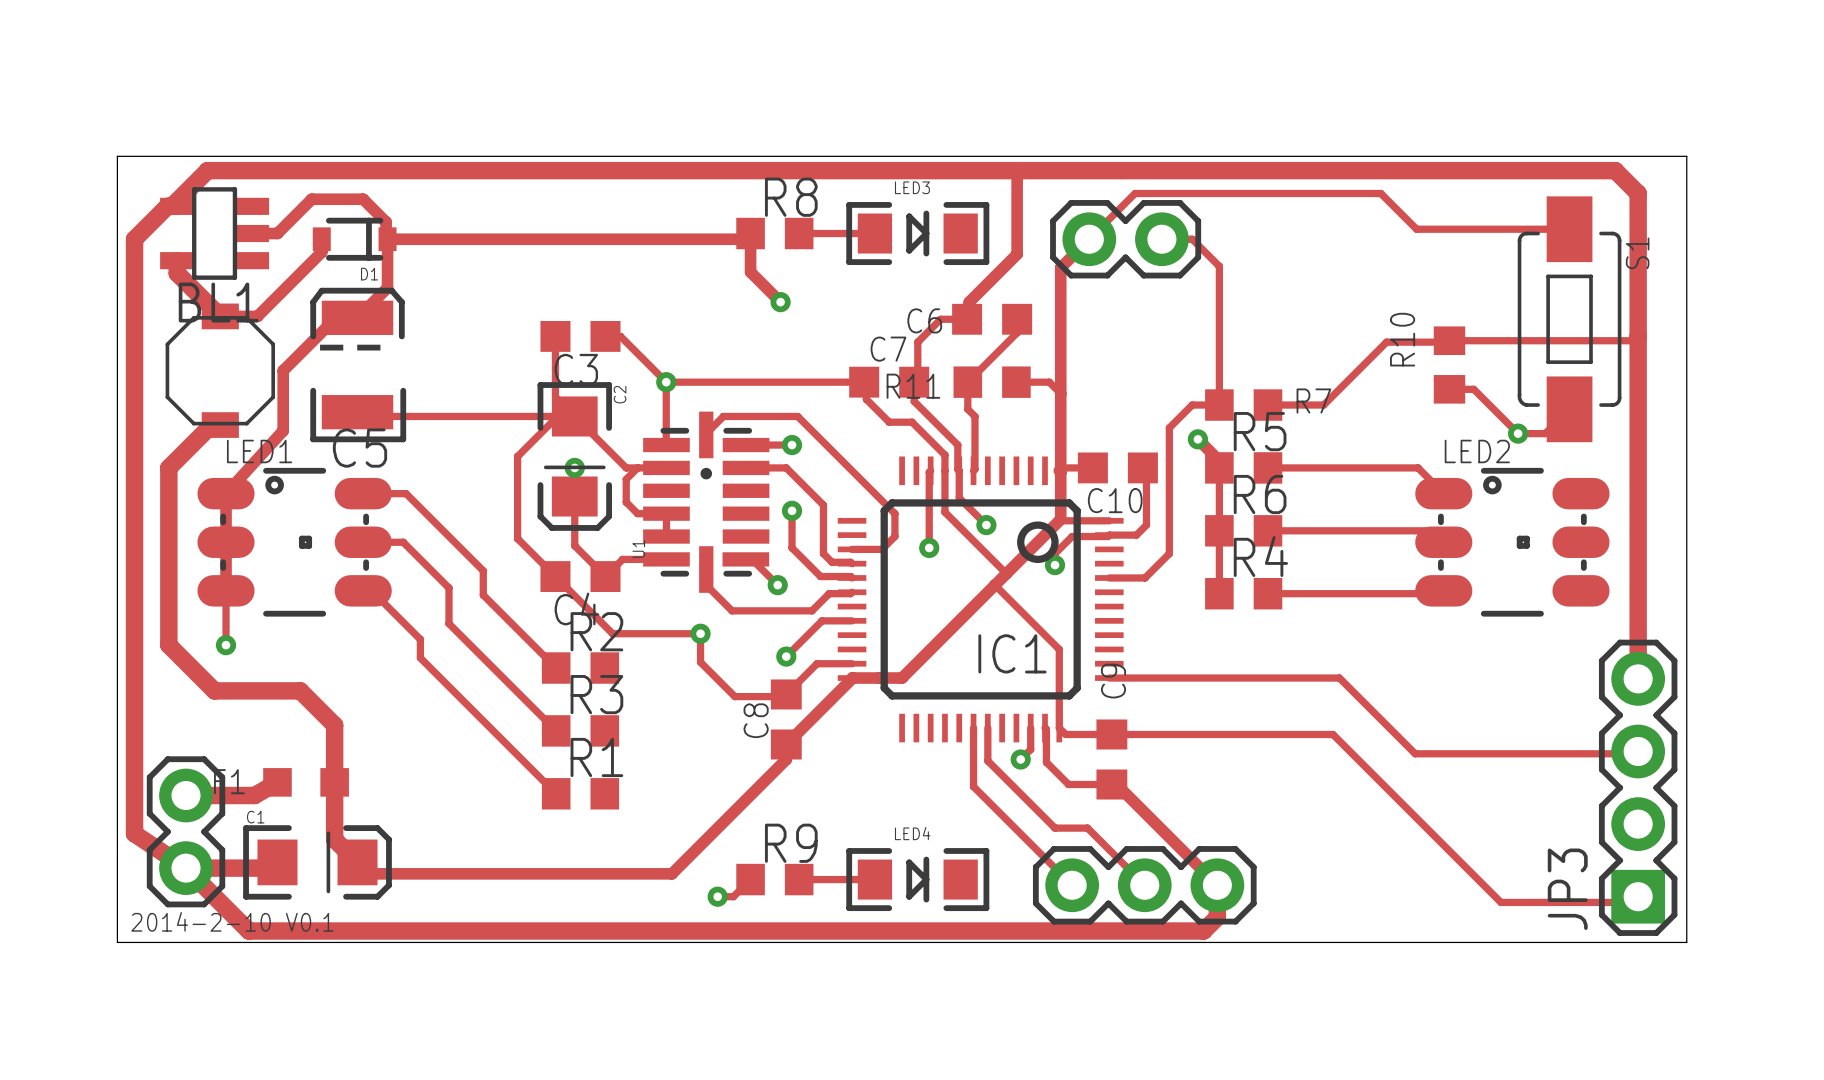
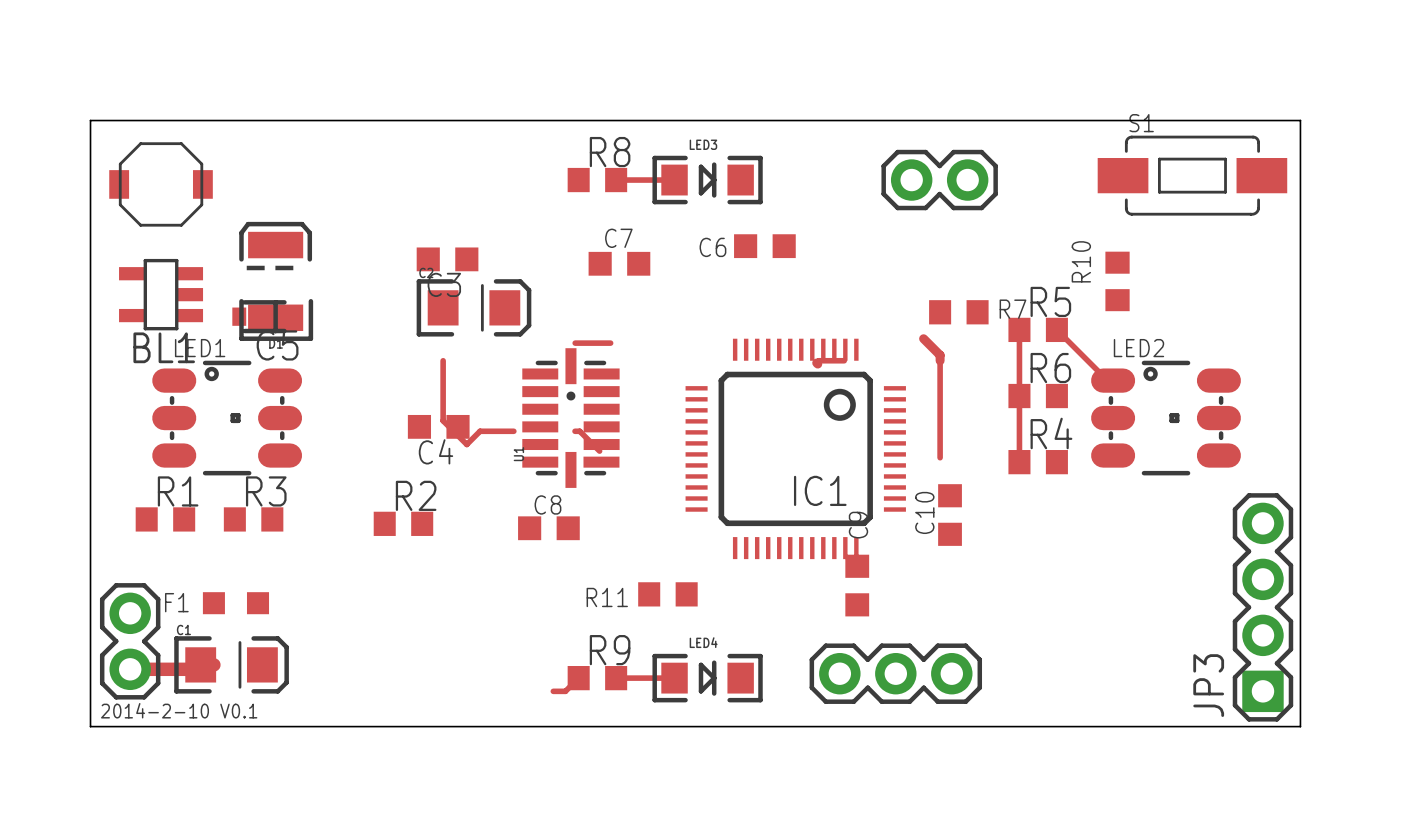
track: (1020, 170) (1017, 174) (1017, 254) (969, 302) (969, 317) (967, 319) (940, 319) (917, 342) (917, 378) (914, 382) (914, 401) (957, 445) (959, 497) (986, 525) -> none
track: (1569, 229) (1416, 229) (1380, 193) (1135, 193) (1060, 267) (1060, 519) -> none
BL1 position: (214, 233) -> (161, 294)
track: (251, 233) (277, 233) (311, 199) (363, 199) (386, 222) (387, 239) -> none
track: (321, 239) (321, 252) (257, 316) (220, 316) (177, 273) (177, 260) -> none
D1 position: (354, 239) -> (264, 316)
track: (387, 239) (387, 287) (357, 317) (336, 317) (283, 370) (283, 430) (226, 493) (226, 645) -> none
track: (387, 239) (744, 239) (750, 233) (750, 272) (780, 302) -> none
part position: (1125, 239) -> (939, 180)
track: (1161, 239) (1192, 239) (1219, 266) (1219, 405) (1192, 405) (1169, 427) (1169, 553) (1145, 577) (1109, 577) -> none
via: (780, 302) -> none
track: (1017, 319) (1017, 332) (967, 382) (967, 409) (974, 416) (973, 470) -> none
S1 rotation: 0° (1569, 319) -> 90° counterclockwise (1192, 175)
track: (555, 336) (555, 397) (626, 467) (666, 467) -> none
track: (605, 336) (620, 336) (666, 382) -> none
track: (1638, 336) (1633, 340) (1386, 342) (1323, 405) (1267, 405) -> none
part rotation: 0° (220, 370) -> 90° clockwise (161, 184)
part position: (220, 370) -> (161, 184)
track: (666, 382) (864, 382) (866, 384) (866, 399) (889, 422) (912, 422) (944, 455) (944, 512) (1006, 573) -> none
track: (666, 382) (666, 444) -> none
via: (666, 382) -> none
C7 position: (889, 382) -> (619, 263)
R11 position: (992, 382) -> (667, 594)
track: (1016, 382) (1049, 382) (1060, 393) -> none
track: (1449, 389) (1473, 389) (1518, 433) (1545, 433) (1569, 409) -> none
track: (357, 412) (361, 416) (574, 416) -> none
track: (557, 416) (517, 456) (517, 538) (612, 633) (700, 633) (700, 662) (734, 696) (784, 696) (817, 663) (852, 663) -> none
track: (220, 425) (211, 425) (168, 467) (168, 645) (214, 690) (300, 690) (334, 725) (334, 839) (368, 873) (671, 873) (786, 759) (786, 744) (852, 678) -> none
track: none -> (1019, 329) (1019, 462)
track: none -> (1056, 329) (1107, 380) (1117, 380)
via: (1518, 433) -> none
track: (706, 434) (723, 416) (797, 416) (894, 513) (894, 536) (882, 549) (852, 549) -> none
via: (1197, 439) -> none
via: (792, 445) -> none
C2 rotation: 0° (574, 456) -> 90° counterclockwise (473, 307)
via: (574, 467) -> none
track: (637, 467) (626, 479) (626, 502) (637, 513) (666, 513) (666, 536) -> none
track: (746, 467) (786, 467) (823, 505) (823, 553) (832, 562) (852, 563) -> none
C10 rotation: 0° (1117, 467) -> 90° clockwise (950, 515)
C10 position: (1117, 467) -> (950, 515)
track: (1142, 467) (1146, 471) (1146, 525) (1136, 535) (1072, 536) (1055, 553) (1055, 565) -> none
R5 position: (1243, 467) -> (1038, 329)
track: (1267, 467) (1418, 467) (1443, 493) -> none
track: (930, 470) (929, 547) -> none
track: (363, 493) (406, 493) (483, 570) (483, 595) (556, 668) -> none
U1 position: (706, 502) -> (570, 418)
track: (792, 510) (792, 547) (820, 576) (852, 577) -> none
via: (792, 510) -> none
track: (1060, 519) (1109, 520) -> none
track: (1060, 519) (902, 678) (852, 678) -> none
via: (986, 525) -> none
R6 position: (1243, 530) -> (1038, 396)
track: (1267, 530) (1432, 530) (1443, 542) -> none
track: (363, 542) (403, 542) (448, 587) (448, 623) (556, 730) -> none
via: (929, 547) -> none
via: (1055, 565) -> none
track: (706, 569) (706, 585) (731, 610) (812, 610) (829, 593) (852, 592) -> none
C4 position: (580, 576) -> (438, 426)
via: (777, 585) -> none
track: (994, 585) (1059, 649) (1059, 728) (1065, 734) (1333, 734) (1500, 902) (1632, 902) (1638, 896) -> none
track: (363, 590) (371, 590) (420, 639) (420, 658) (556, 793) -> none
track: (1443, 590) (1440, 593) (1267, 593) -> none
R4 position: (1243, 593) -> (1038, 462)
IC1 position: (980, 599) -> (795, 448)
track: (852, 620) (822, 620) (786, 656) -> none
via: (700, 633) -> none
via: (226, 645) -> none
via: (786, 656) -> none
R2 position: (580, 668) -> (403, 523)
track: (1109, 678) (1339, 678) (1415, 753) (1635, 753) (1638, 751) -> none
track: (1638, 678) (1638, 193) (1615, 170) (207, 170) (174, 203) (177, 206) (167, 206) (134, 239) (134, 833) (186, 868) (248, 931) (1203, 931) (1217, 917) (1217, 885) (1116, 784) (1068, 784) (1046, 762) (1045, 728) -> none
C8 rotation: 0° (786, 719) -> 90° clockwise (548, 528)
C8 position: (786, 719) -> (548, 528)
track: (973, 728) (973, 786) (1072, 885) -> none
track: (987, 728) (987, 760) (1055, 828) (1087, 828) (1144, 885) -> none
track: (1030, 728) (1030, 749) (1020, 759) -> none
R3 position: (580, 730) -> (253, 519)
via: (1020, 759) -> none
track: (277, 782) (254, 795) (186, 795) -> none
R1 position: (580, 793) -> (165, 519)
part position: (186, 831) -> (130, 641)
C1 position: (317, 862) -> (231, 664)
part position: (1144, 885) -> (895, 673)
via: (717, 896) -> none

